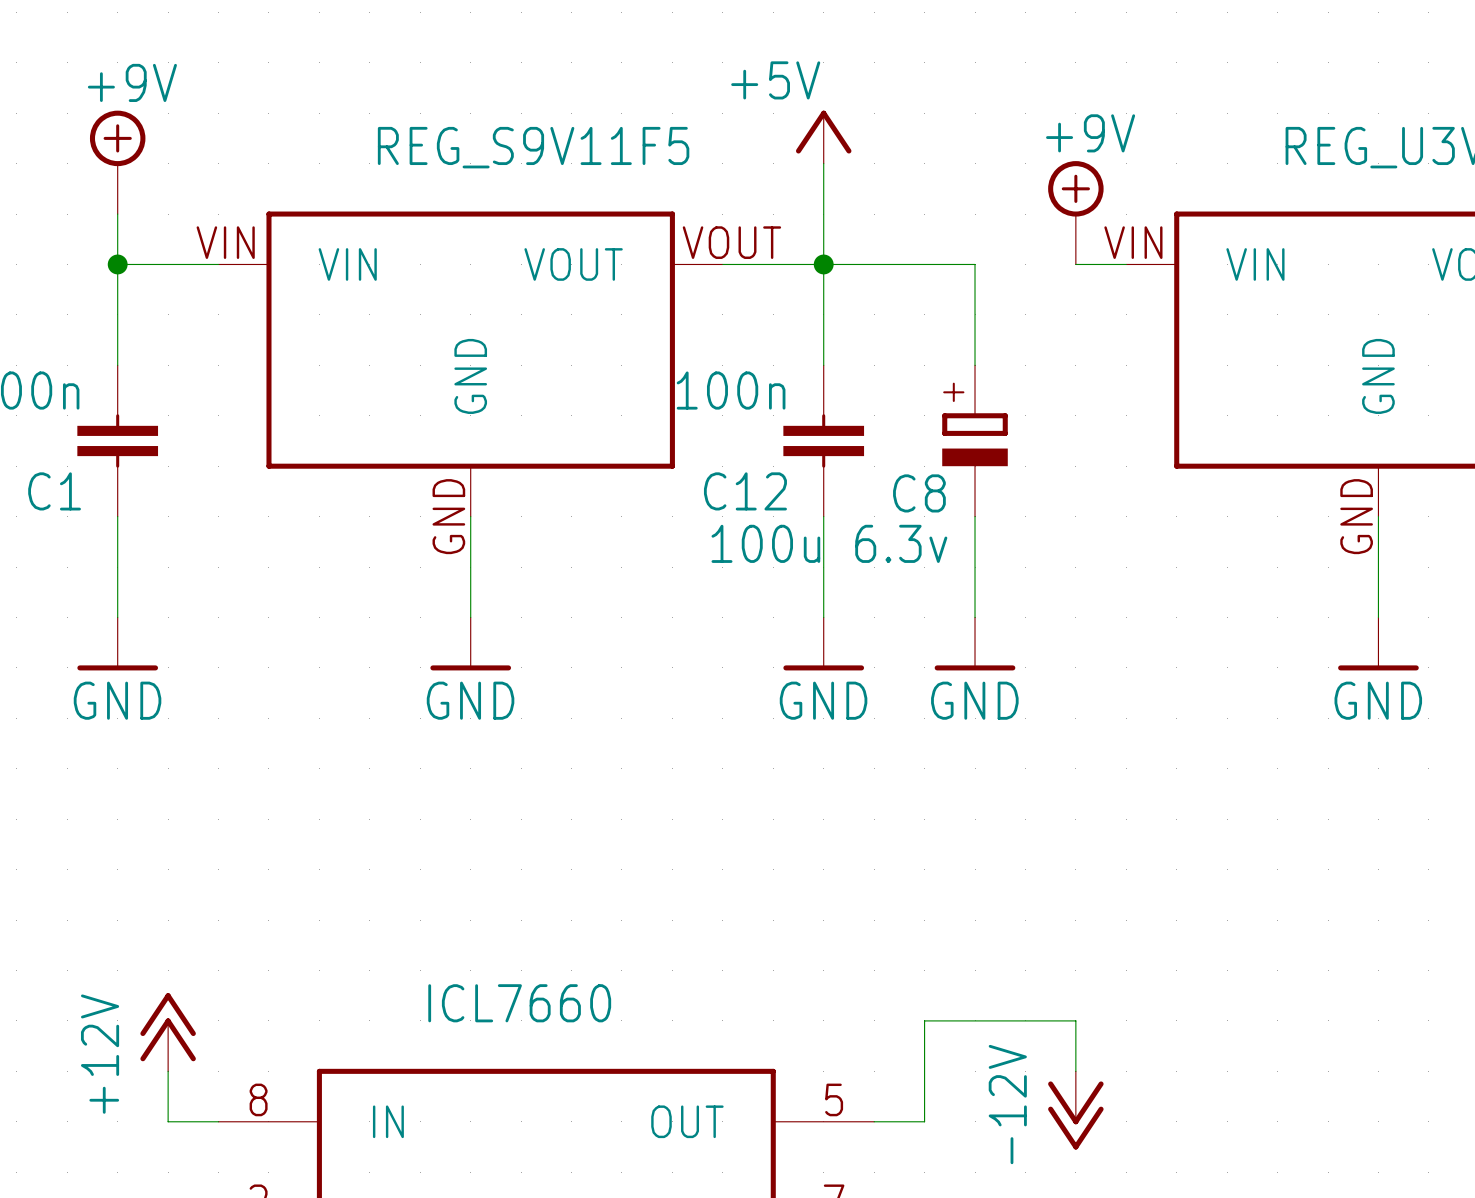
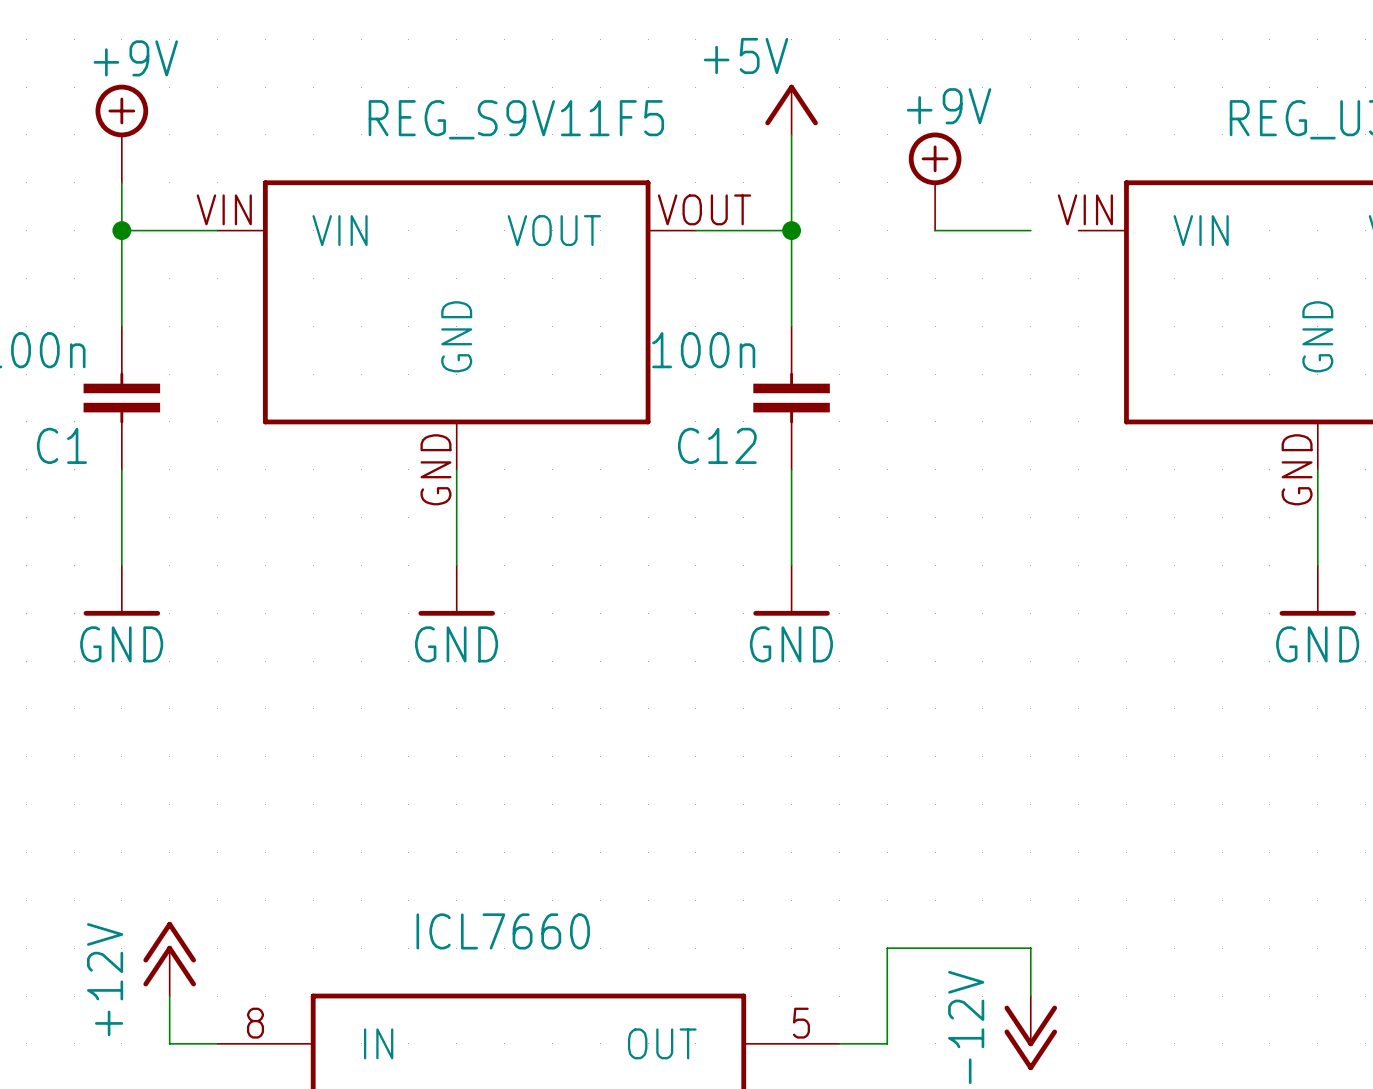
power symbol position: +9V (1075, 212) -> +9V (935, 181)
wire: (823, 264) (975, 264) (975, 365) -> none
wire: (1075, 264) (1126, 264) -> (1030, 230) (935, 230)
C8: 100u 6.3v (975, 440) -> none
wire: (975, 516) (975, 617) -> none
power symbol: GND (975, 643) -> none

